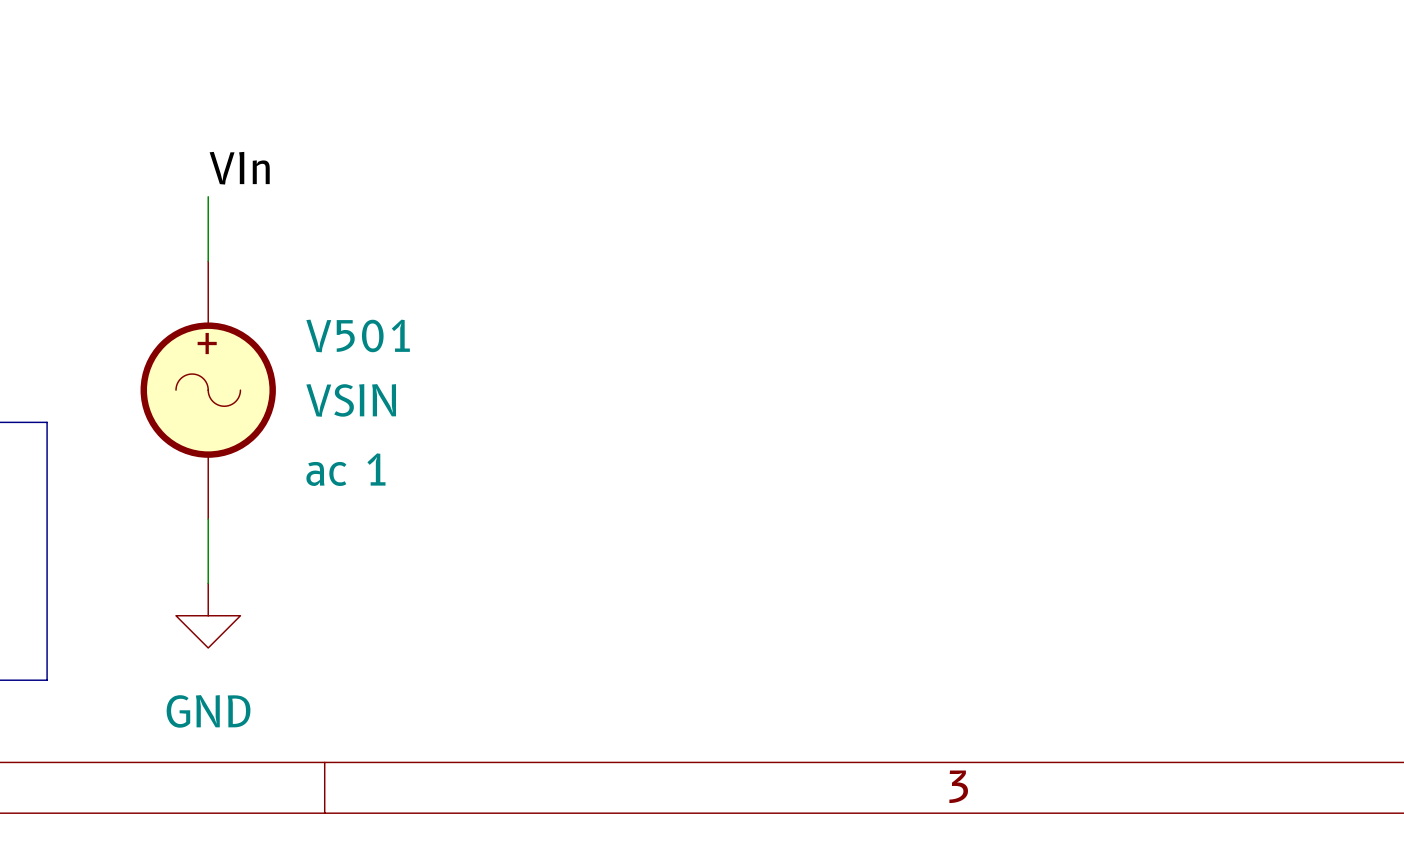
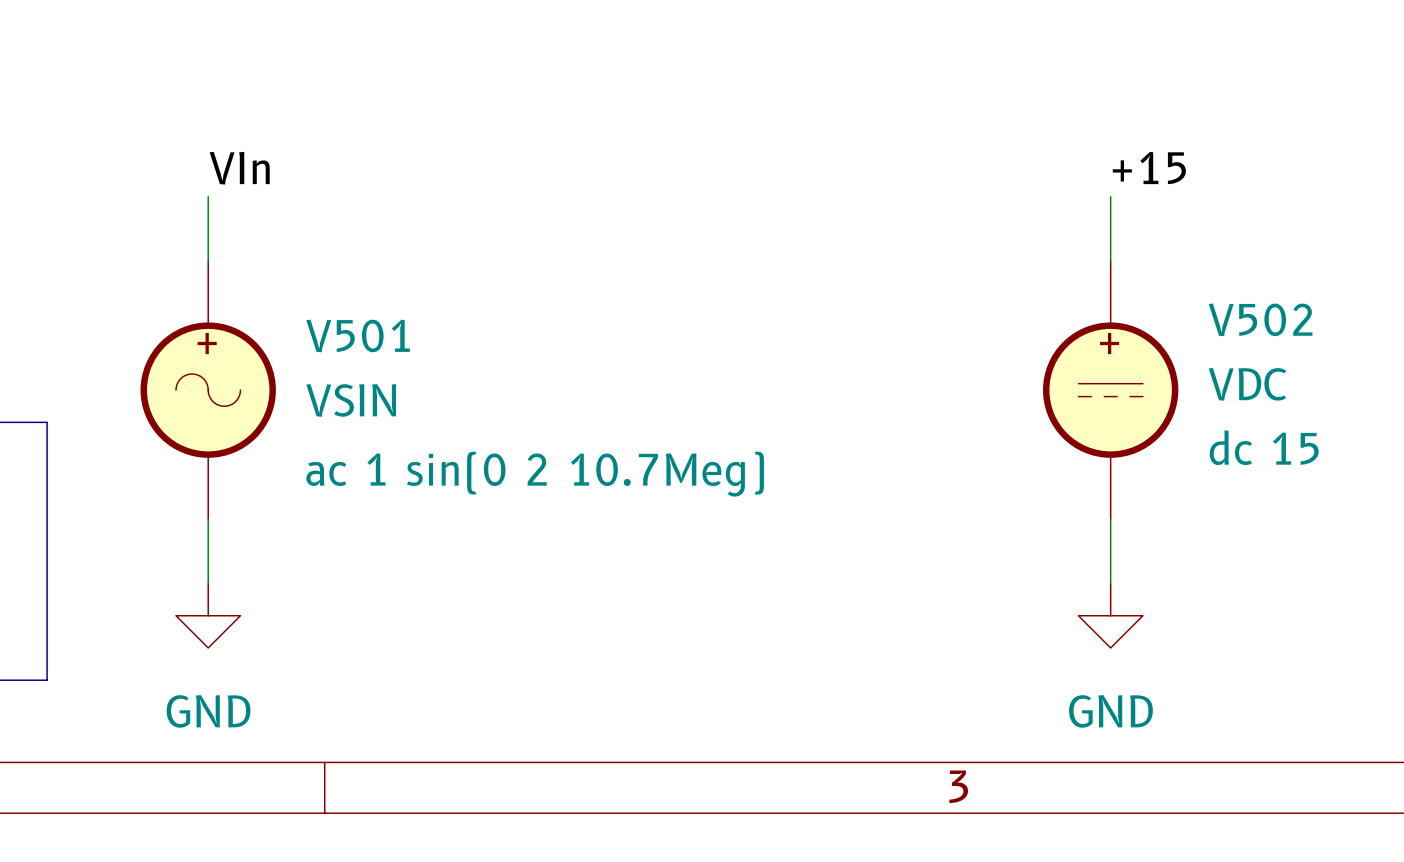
label: none -> +15 (1149, 168)
wire: none -> (1110, 196) (1110, 261)
V502: none -> VDC (1110, 390)
V501 text: ac 1 (345, 469) -> ac 1 sin(0 2 10.7Meg) (535, 474)
wire: none -> (1110, 519) (1110, 583)
power symbol: none -> GND (1110, 615)

